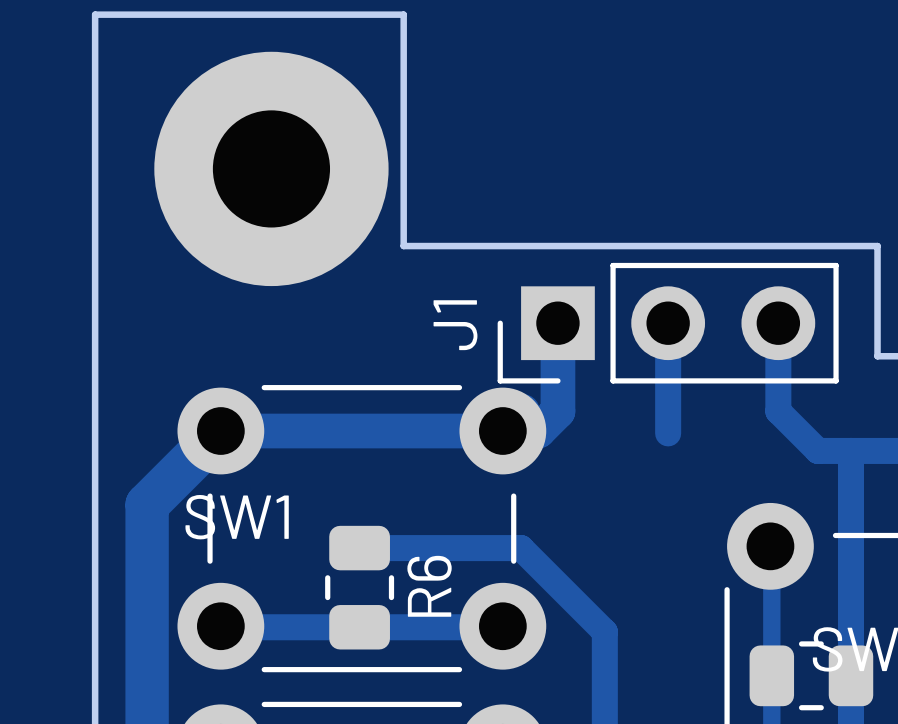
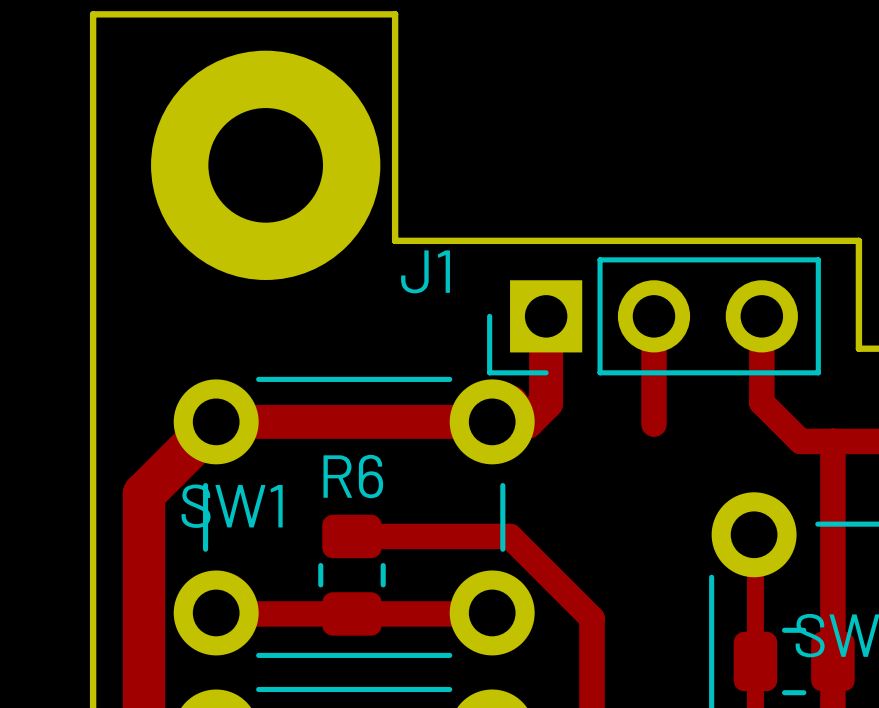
J1 name rotation: 0° (455, 325) -> 90° clockwise (425, 271)
R6 name rotation: 0° (429, 586) -> 90° clockwise (353, 476)
R6 name position: R6 (429, 586) -> R6 (353, 476)

